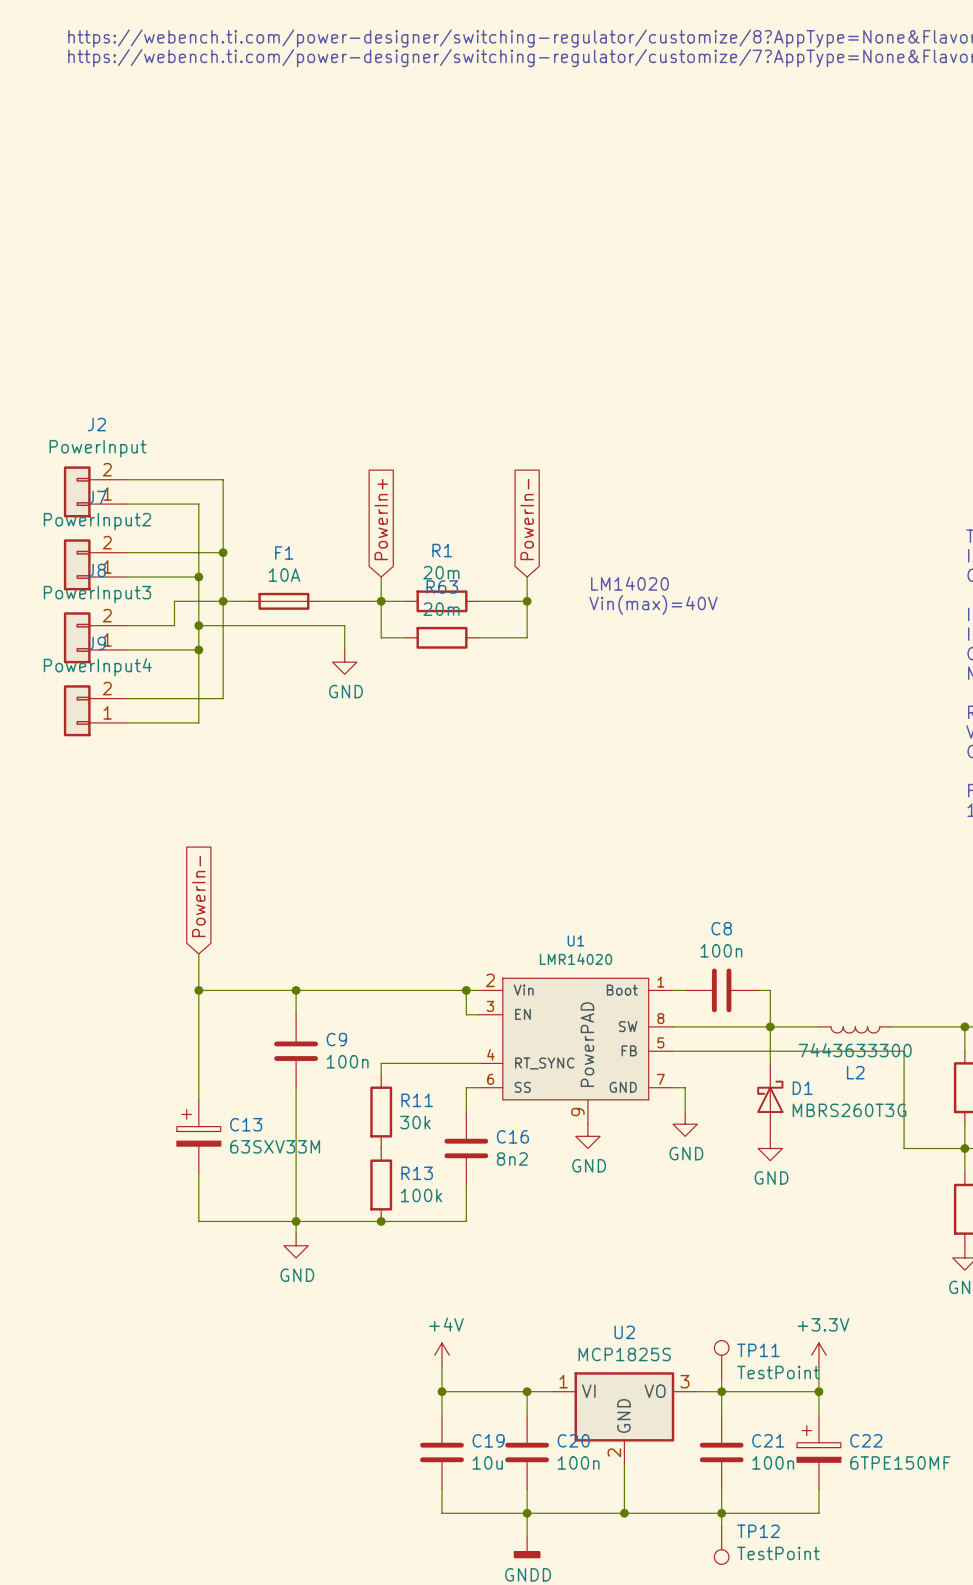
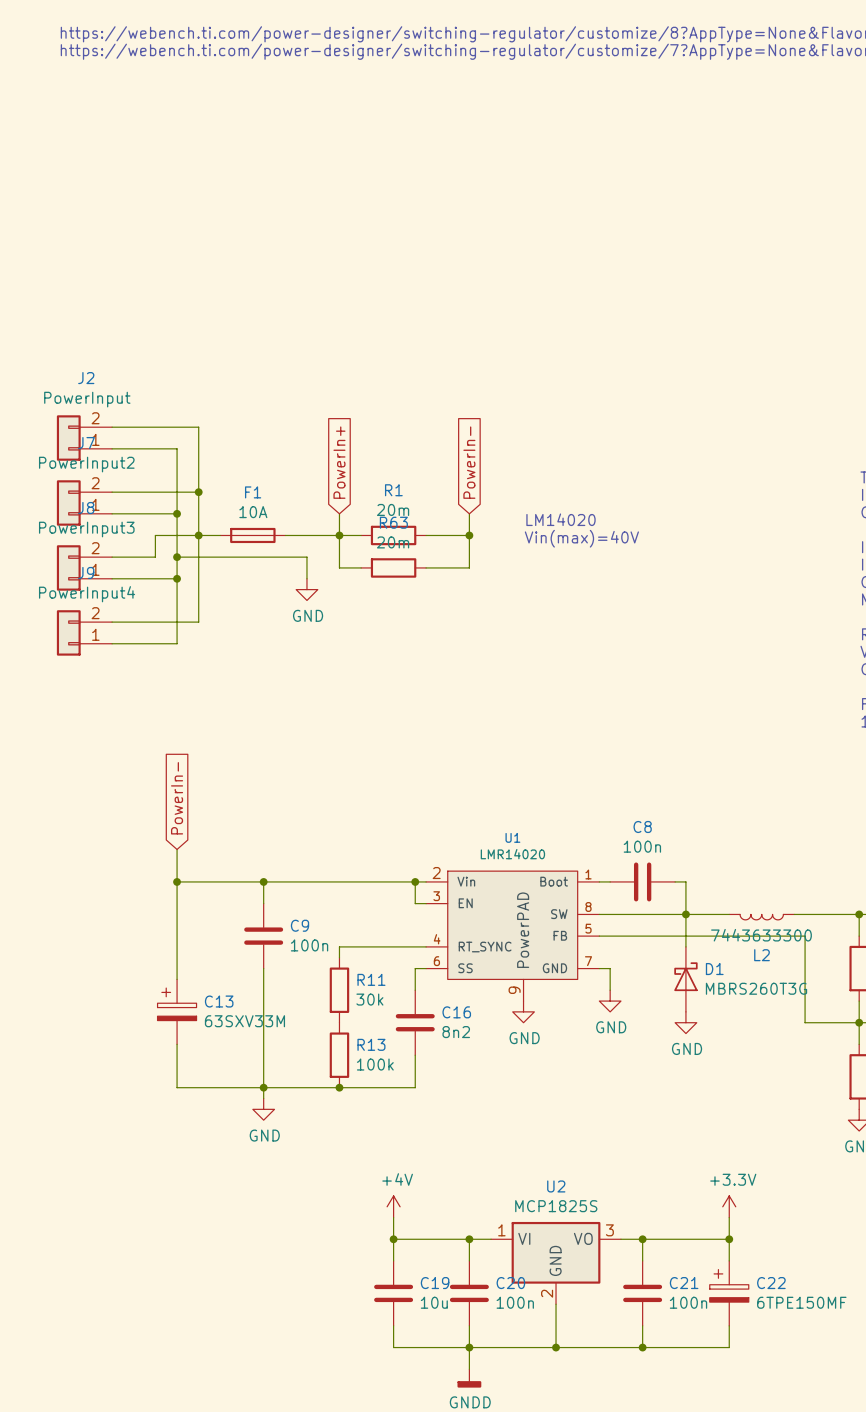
TP11: TestPoint (721, 1360) -> none
wire: (721, 1379) (721, 1391) -> none
wire: (721, 1513) (721, 1525) -> none
TP12: TestPoint (721, 1544) -> none

